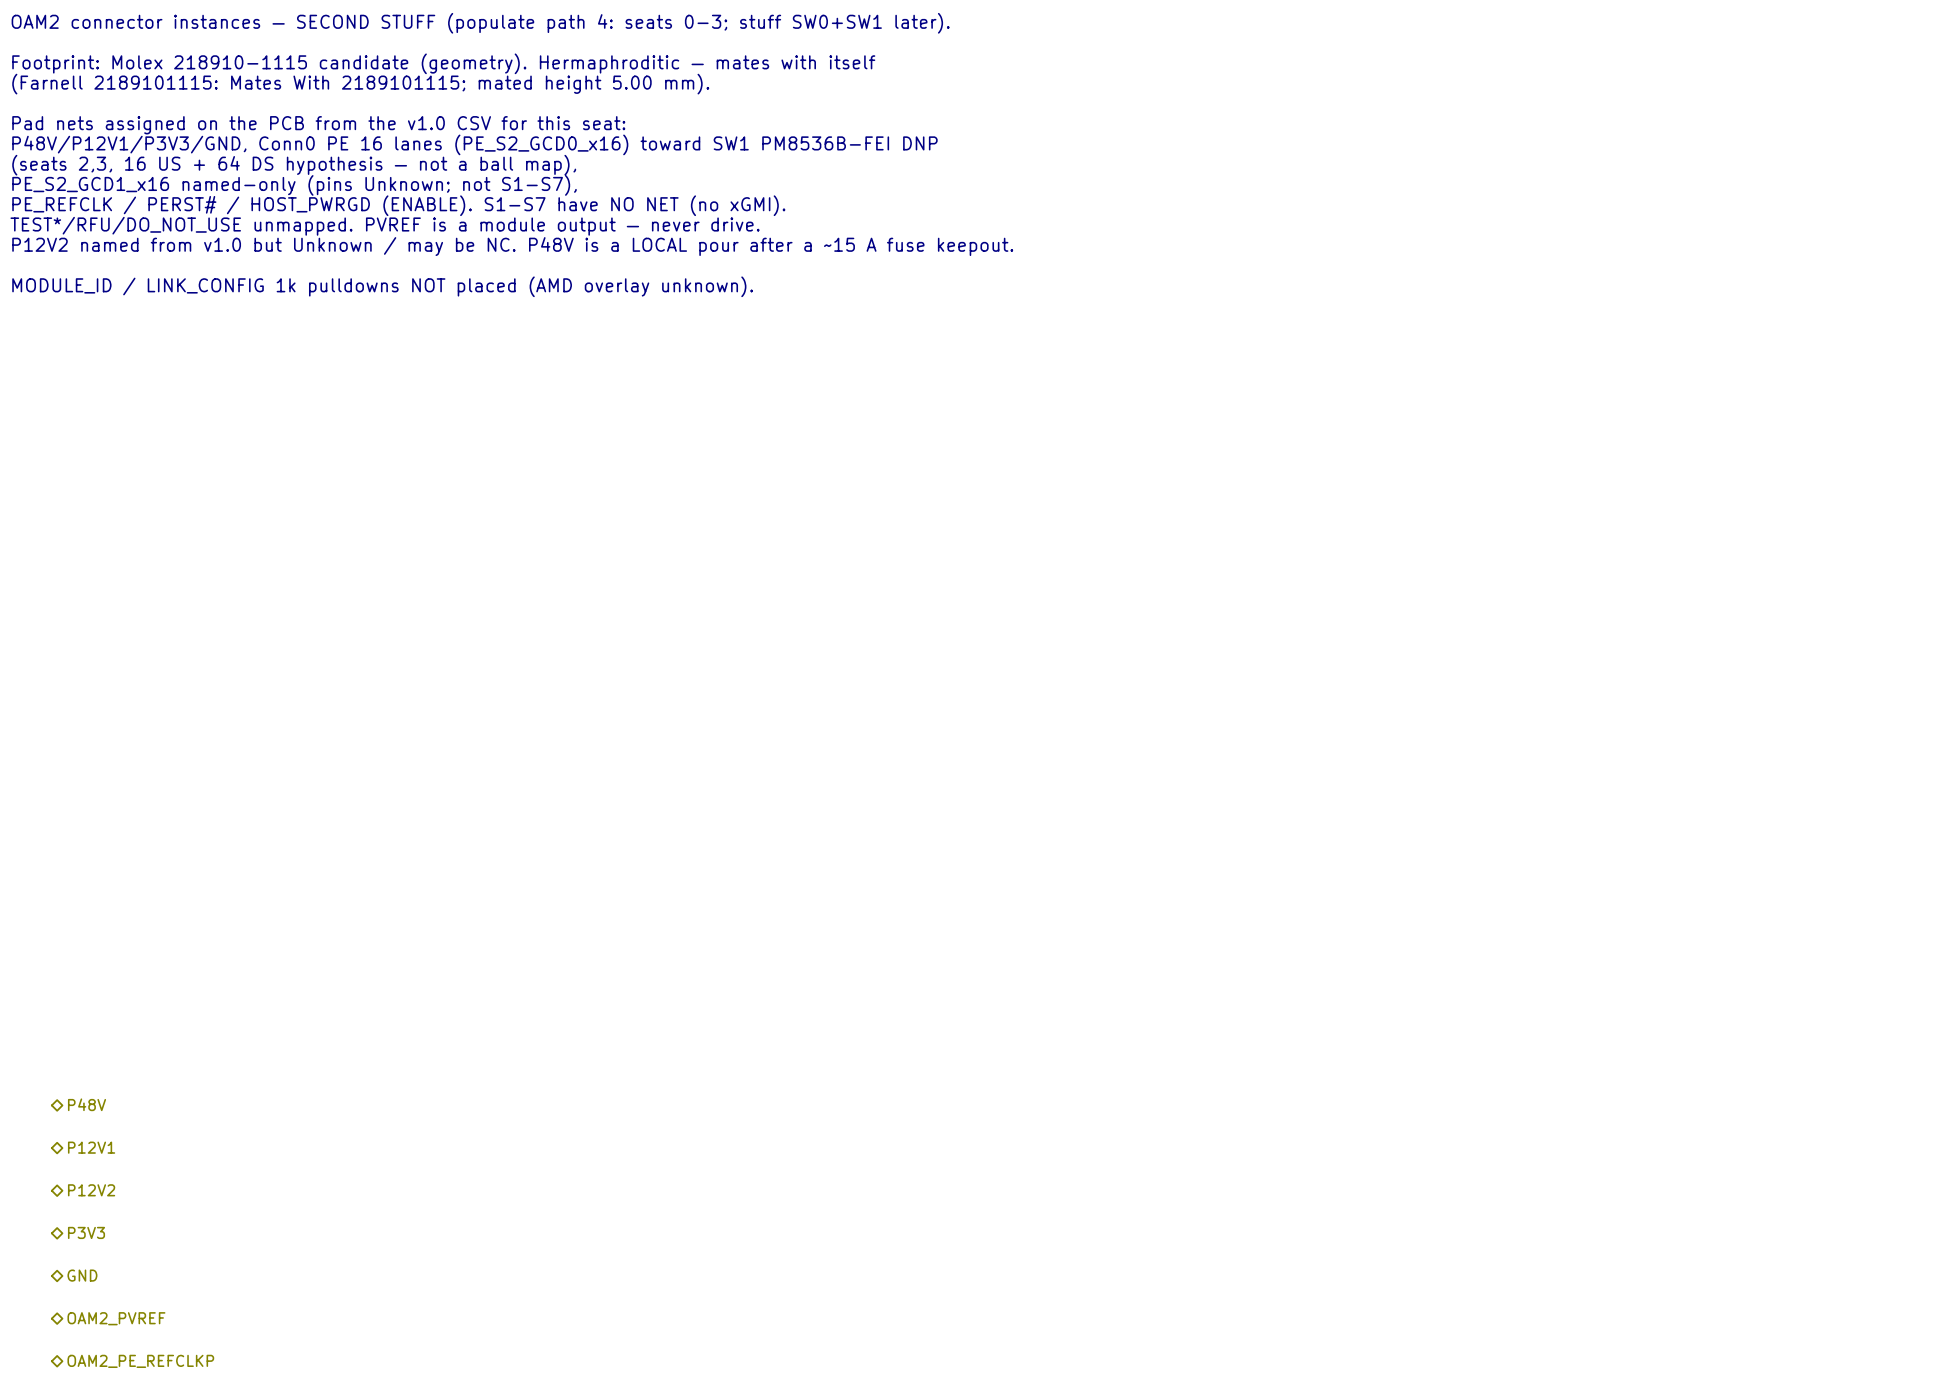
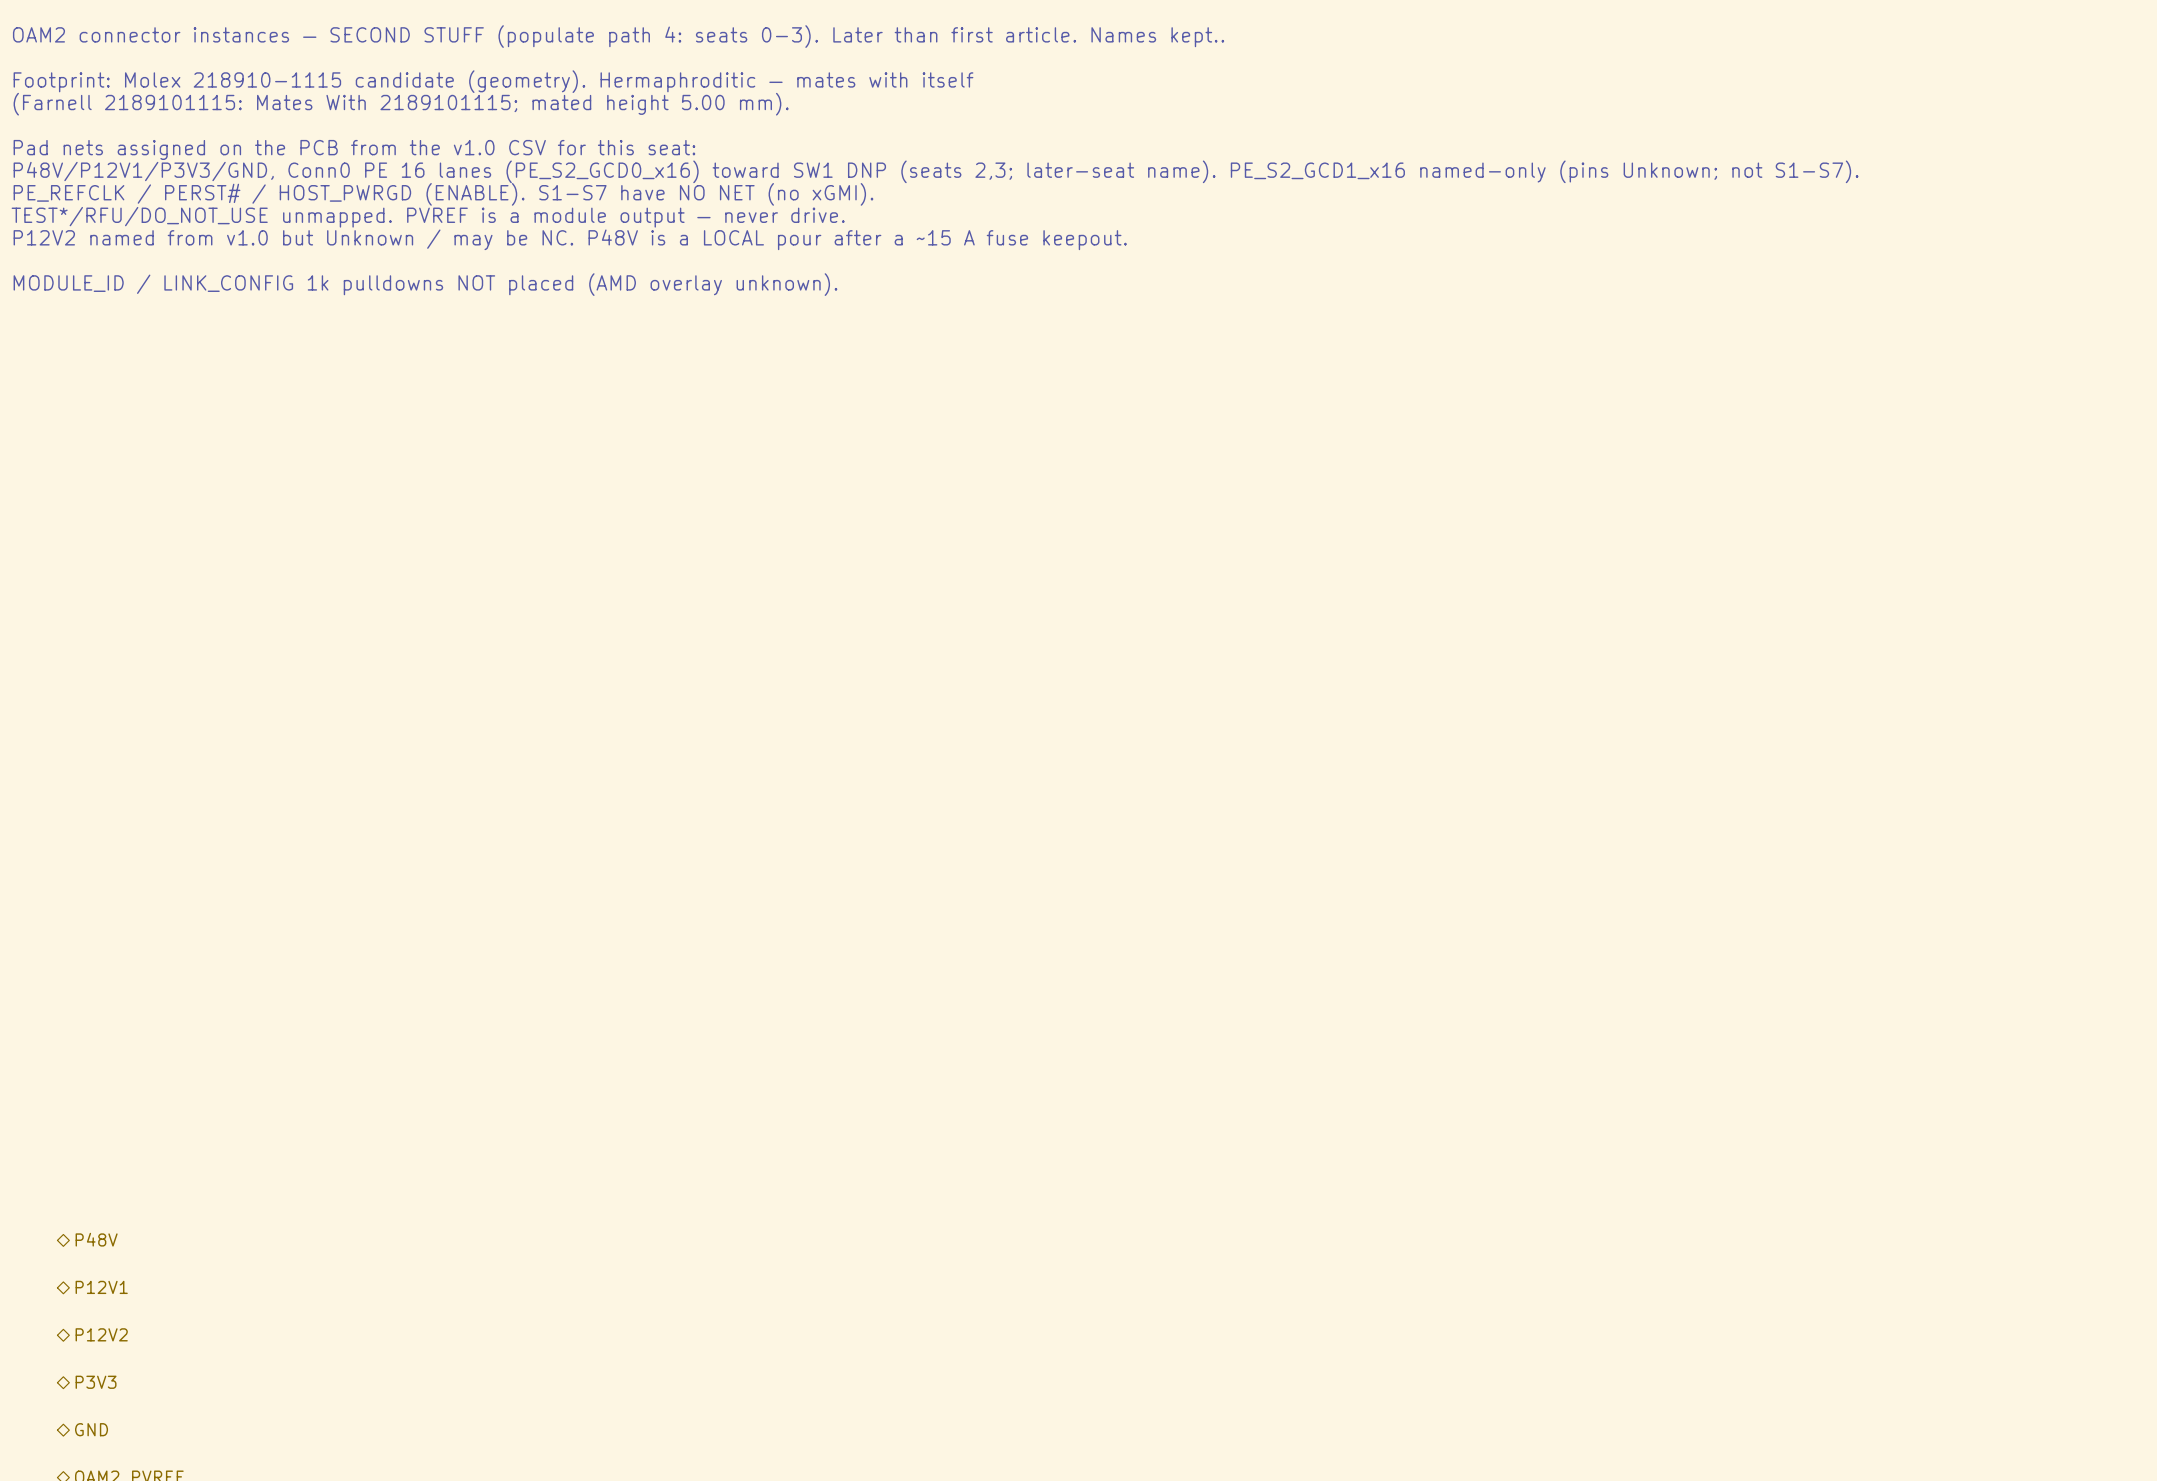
text: OAM2 connector instances — SECOND STUFF (populate path 4: seats 0-3; stuff SW0+SW1 later). (480, 23) -> OAM2 connector instances — SECOND STUFF (populate path 4: seats 0-3). Later than first article. Names kept.. (618, 36)
text: P48V/P12V1/P3V3/GND, Conn0 PE 16 lanes (PE_S2_GCD0_x16) toward SW1 PM8536B-FEI DNP (474, 144) -> P48V/P12V1/P3V3/GND, Conn0 PE 16 lanes (PE_S2_GCD0_x16) toward SW1 DNP (seats 2,3; later-seat name). PE_S2_GCD1_x16 named-only (pins Unknown; not S1-S7). (936, 171)
text: (seats 2,3, 16 US + 64 DS hypothesis — not a ball map), (294, 165) -> PE_REFCLK / PERST# / HOST_PWRGD (ENABLE). S1-S7 have NO NET (no xGMI). (443, 194)
text: PE_S2_GCD1_x16 named-only (pins Unknown; not S1-S7), (294, 185) -> TEST*/RFU/DO_NOT_USE unmapped. PVREF is a module output — never drive. (428, 217)
text: PE_REFCLK / PERST# / HOST_PWRGD (ENABLE). S1-S7 have NO NET (no xGMI). (398, 205) -> P12V2 named from v1.0 but Unknown / may be NC. P48V is a LOCAL pour after a ~15 A fuse keepout. (570, 239)
text: TEST*/RFU/DO_NOT_USE unmapped. PVREF is a module output — never drive. (385, 226) -> none
text: P12V2 named from v1.0 but Unknown / may be NC. P48V is a LOCAL pour after a ~15 A fuse keepout. (512, 246) -> MODULE_ID / LINK_CONFIG 1k pulldowns NOT placed (AMD overlay unknown). (425, 284)
text: MODULE_ID / LINK_CONFIG 1k pulldowns NOT placed (AMD overlay unknown). (382, 286) -> none

